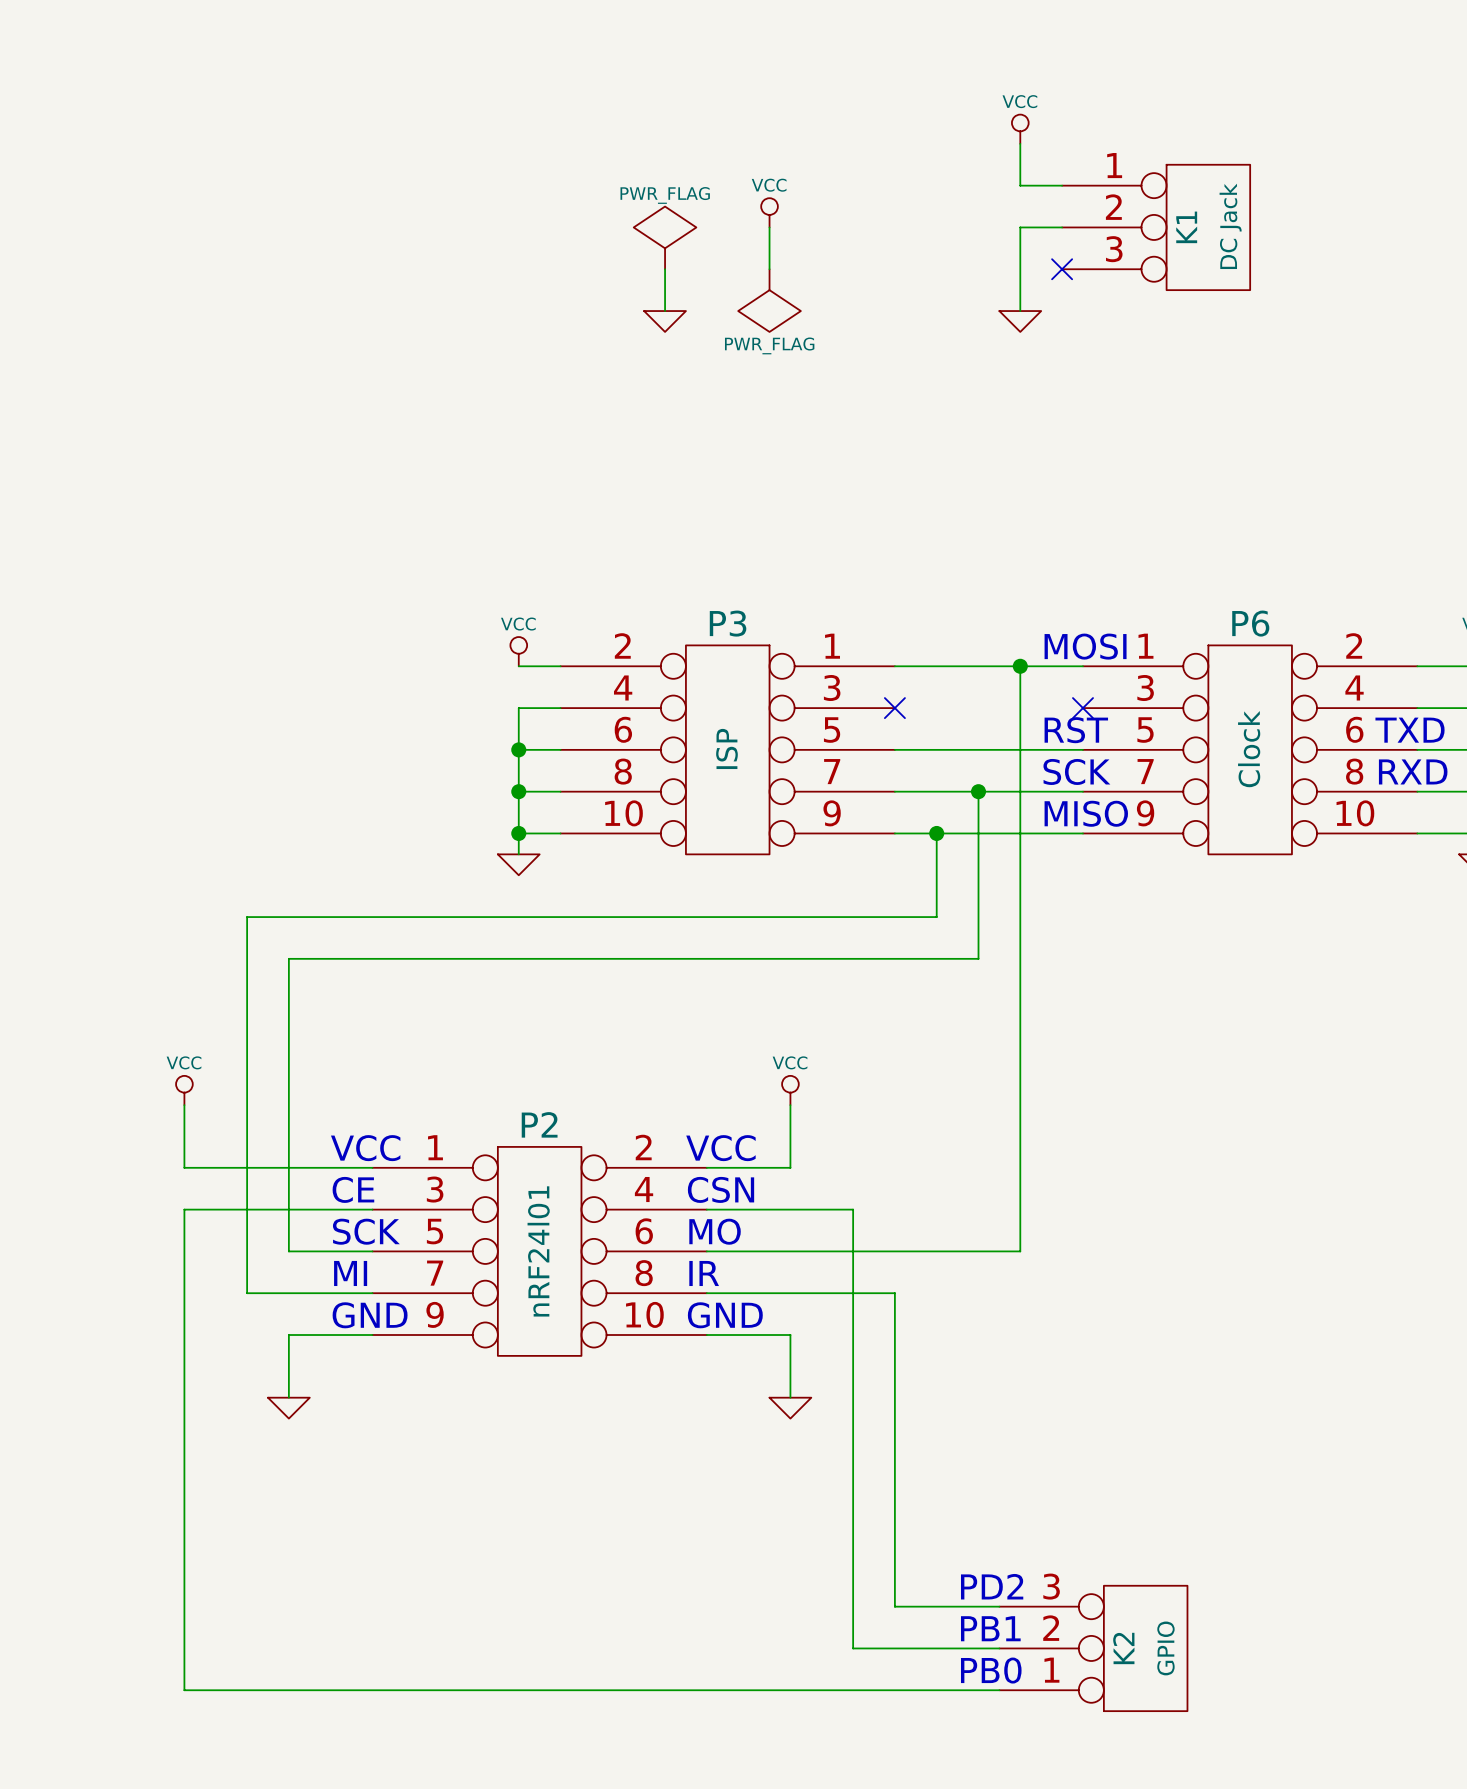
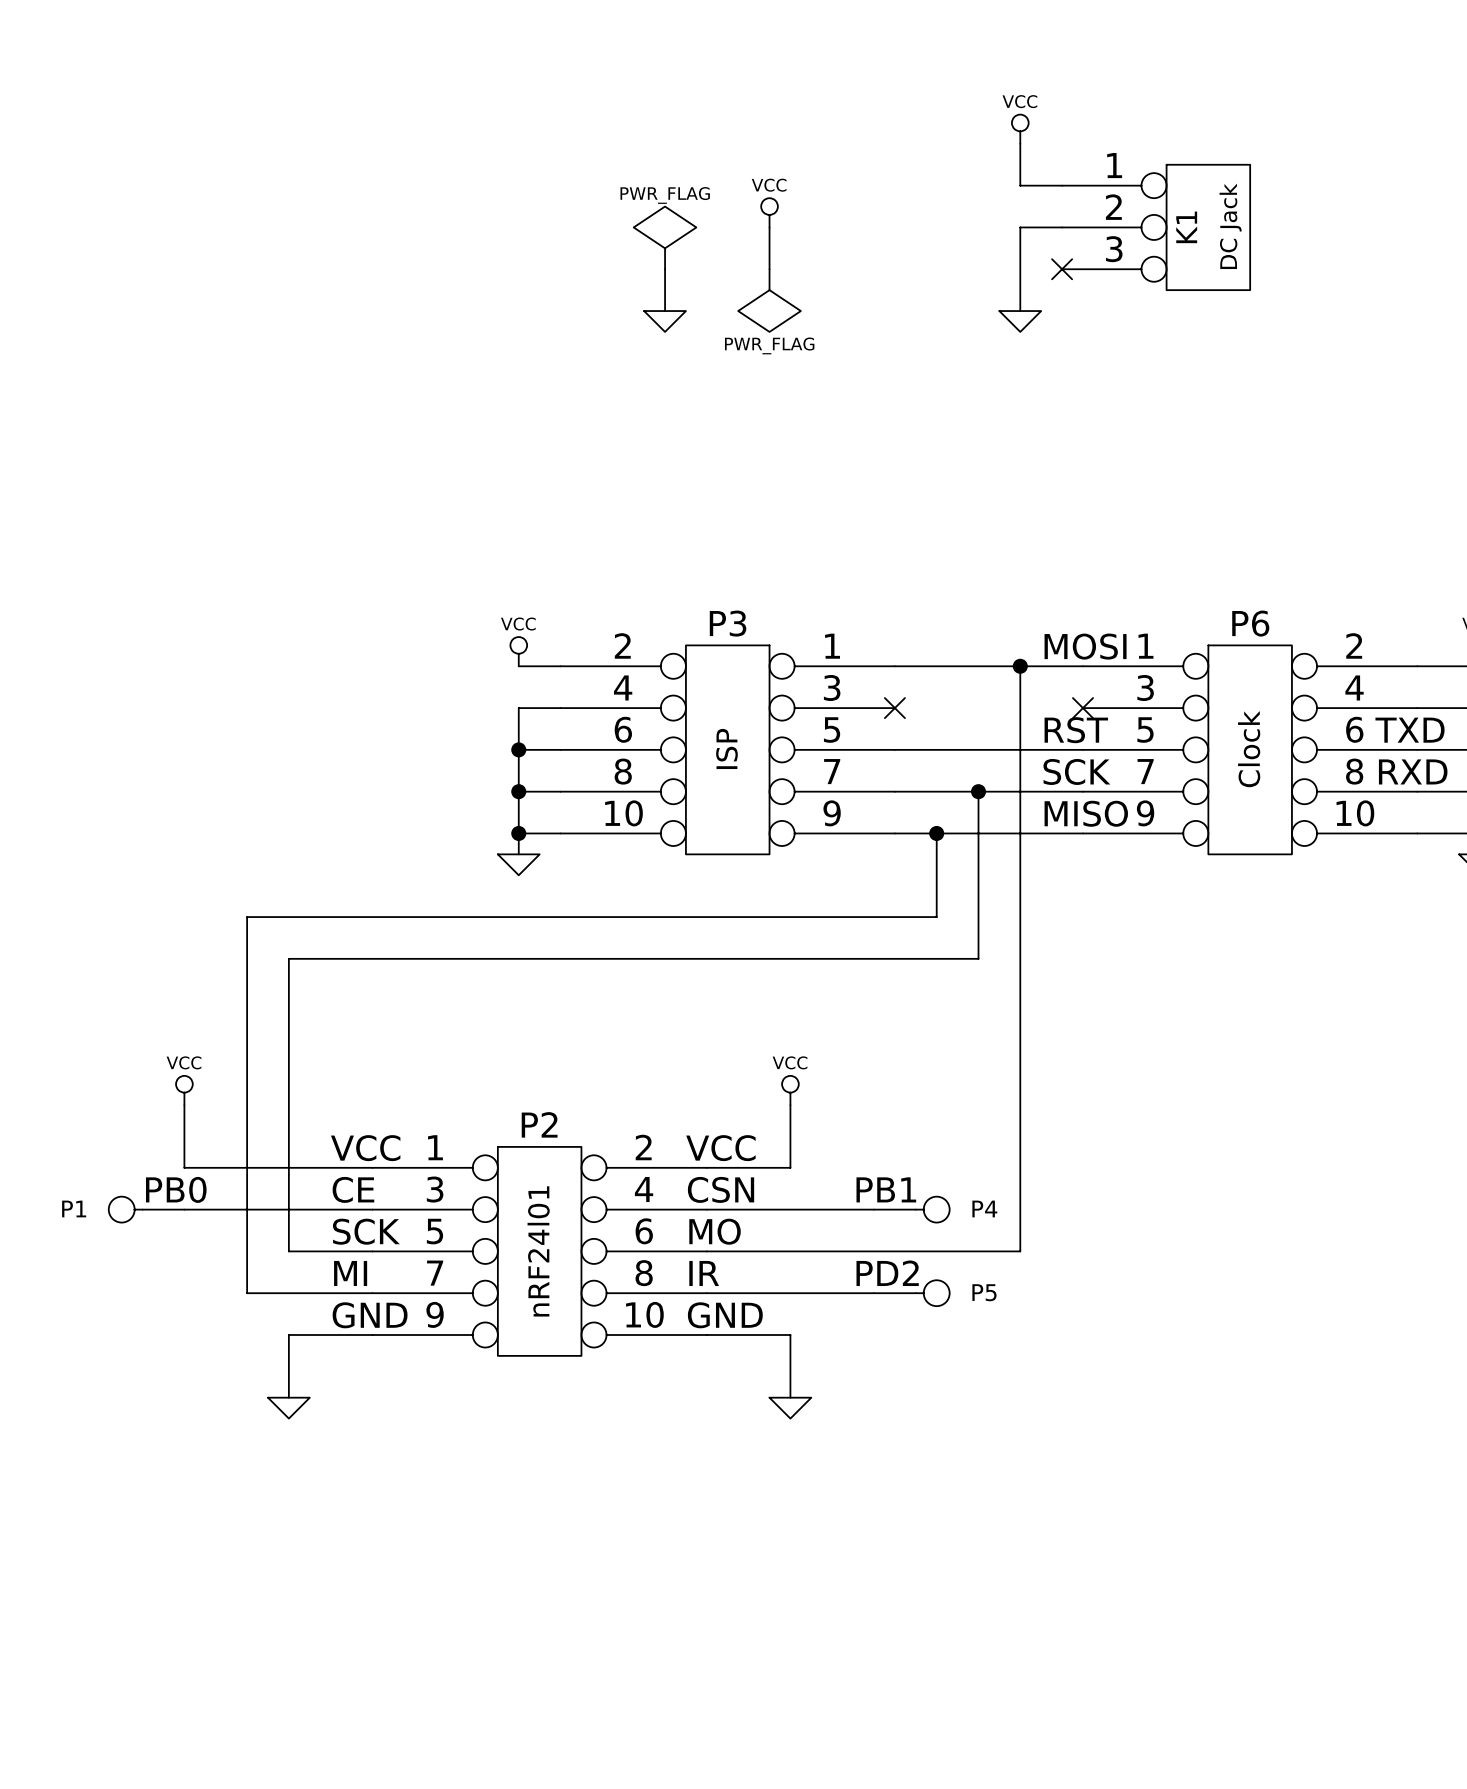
text: none -> PB0 (176, 1189)
text: none -> PB1 (886, 1189)
P1: none -> (146, 1209)
wire: (184, 1209) (184, 1690) (999, 1690) -> none
wire: (853, 1209) (853, 1648) (999, 1648) -> (853, 1209) (874, 1209)
P4: none -> (911, 1209)
wire: (874, 1293) (894, 1293) (894, 1606) (999, 1606) -> none
P5: none -> (911, 1293)
text position: PD2 (992, 1586) -> PD2 (887, 1273)
text: PB1 (990, 1628) -> none
K2: GPIO (1093, 1648) -> none
text: PB0 (991, 1670) -> none

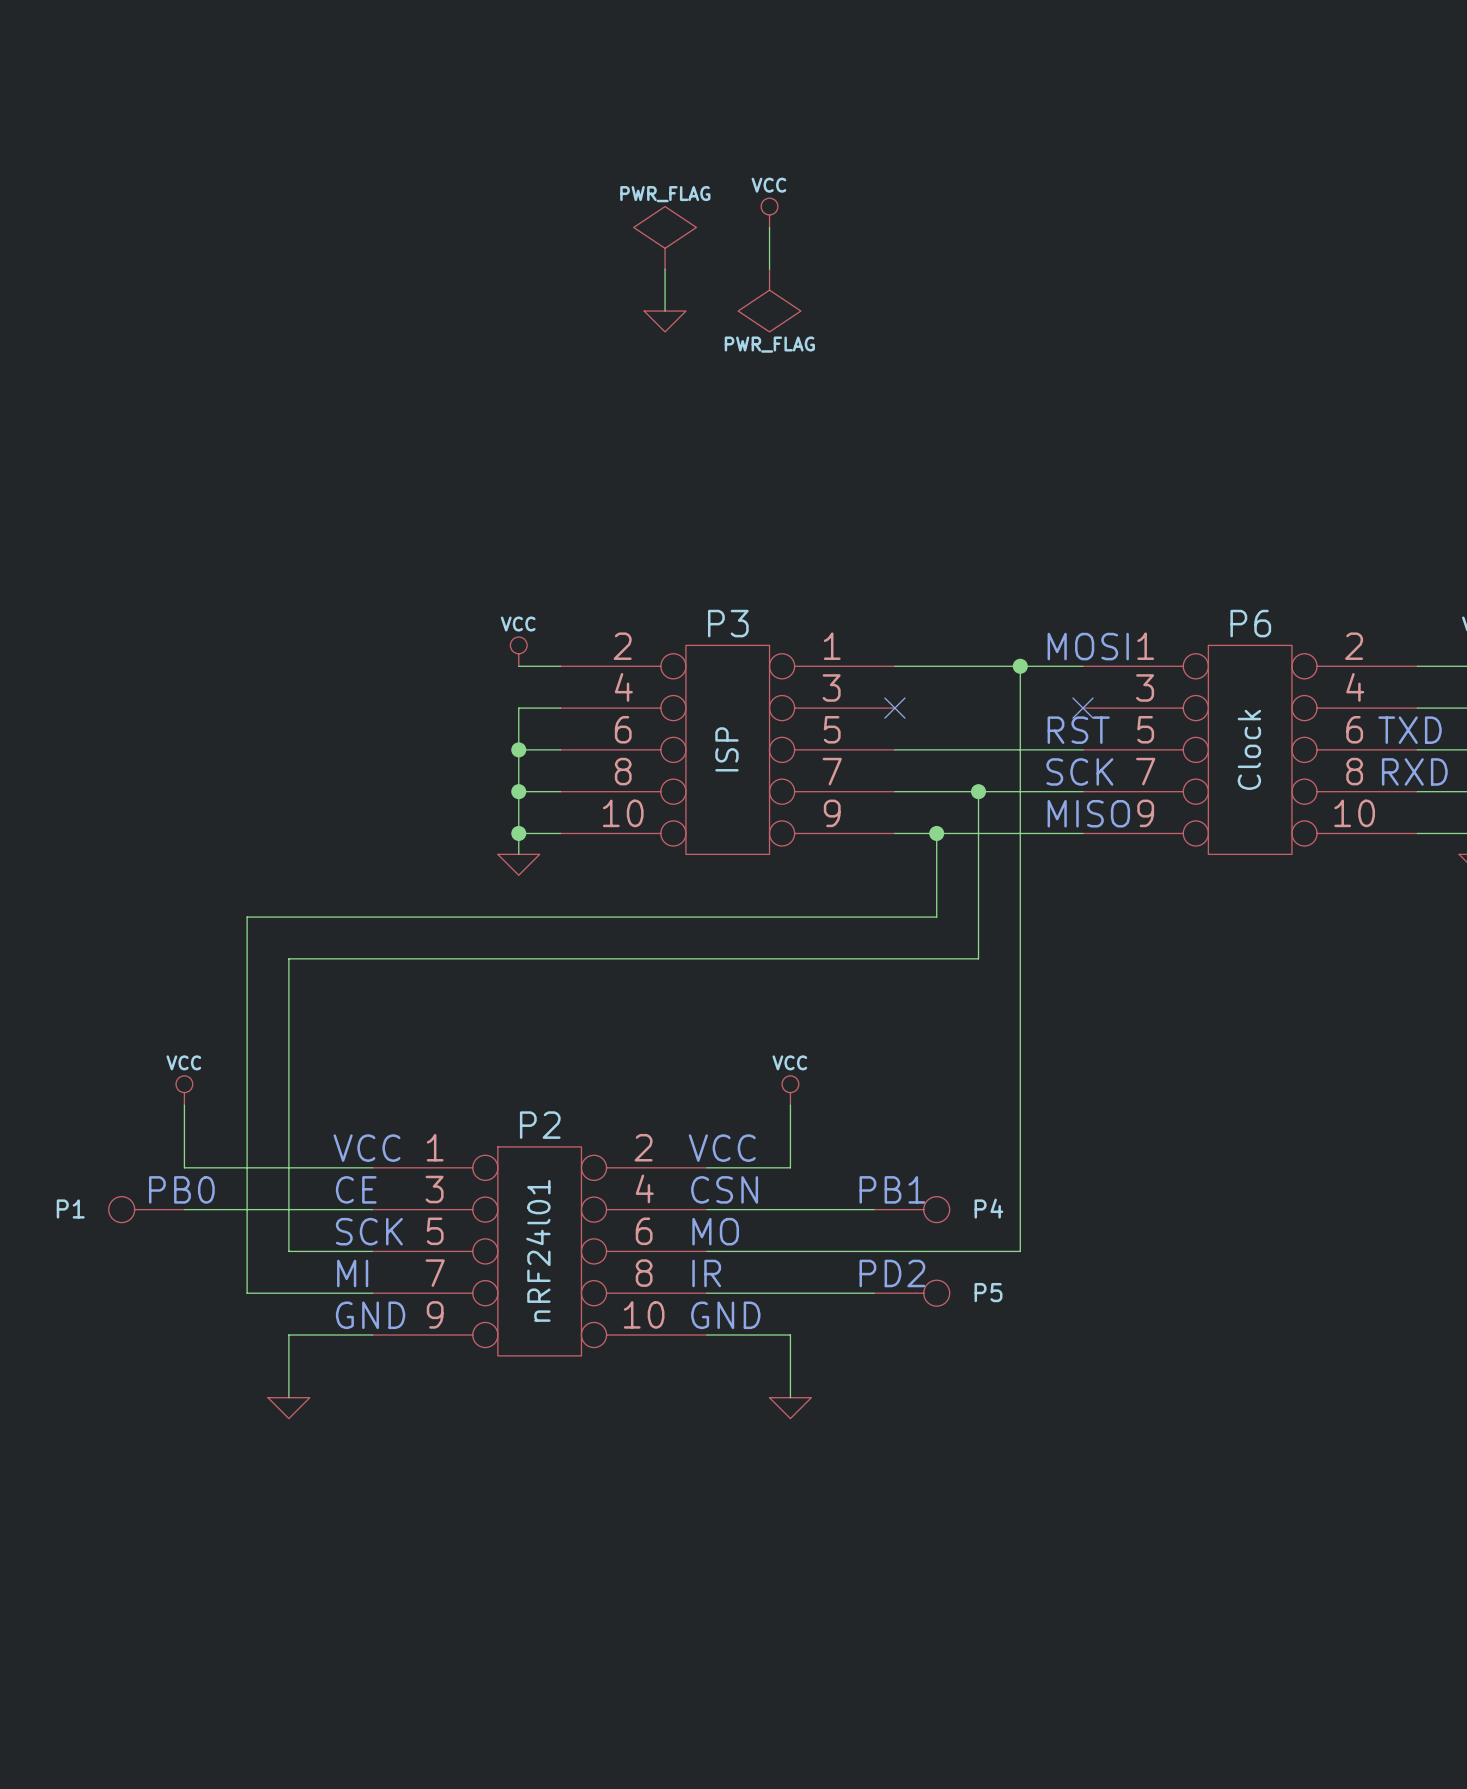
power symbol: VCC (1020, 129) -> none
wire: (1020, 143) (1020, 185) (1062, 185) -> none
wire: (1062, 227) (1020, 227) (1020, 311) -> none
K1: DC Jack (1156, 227) -> none
no-connect mark: (1062, 269) -> none
power symbol: (1020, 321) -> none

